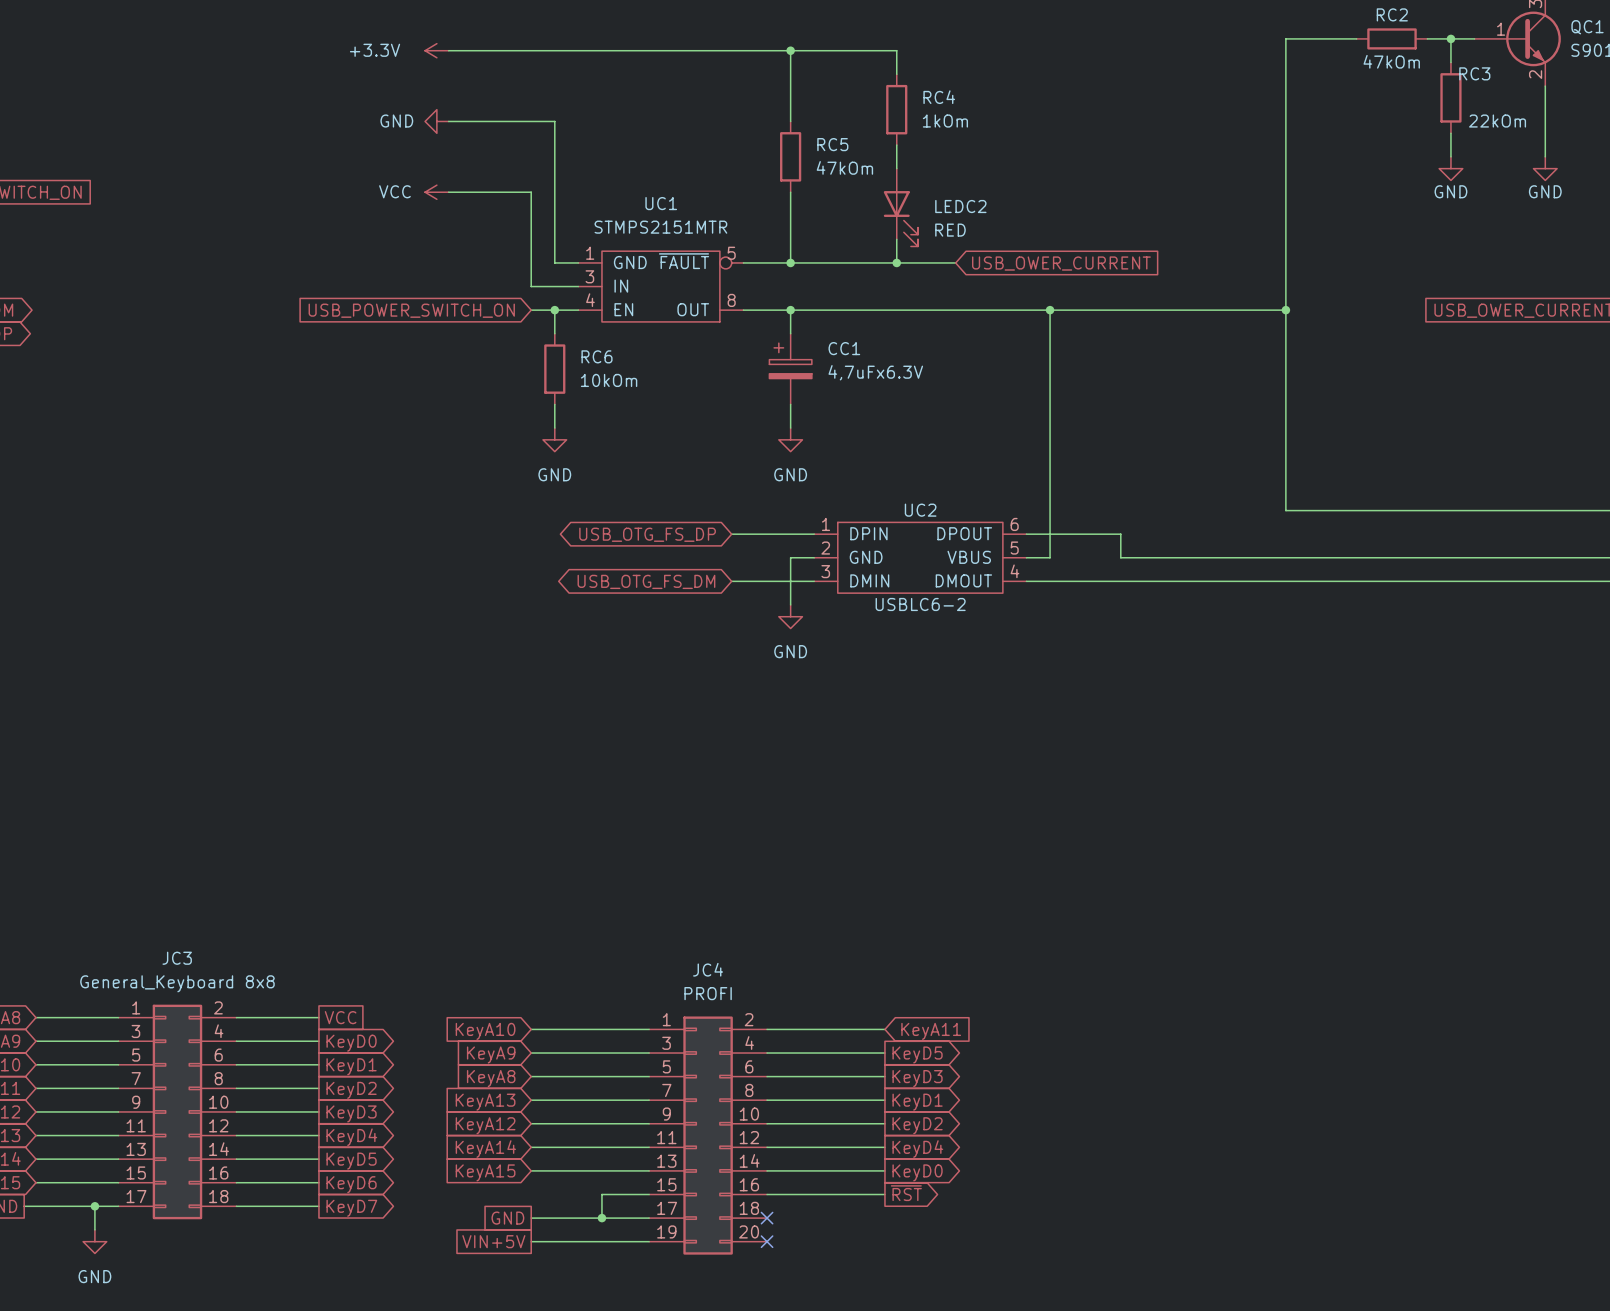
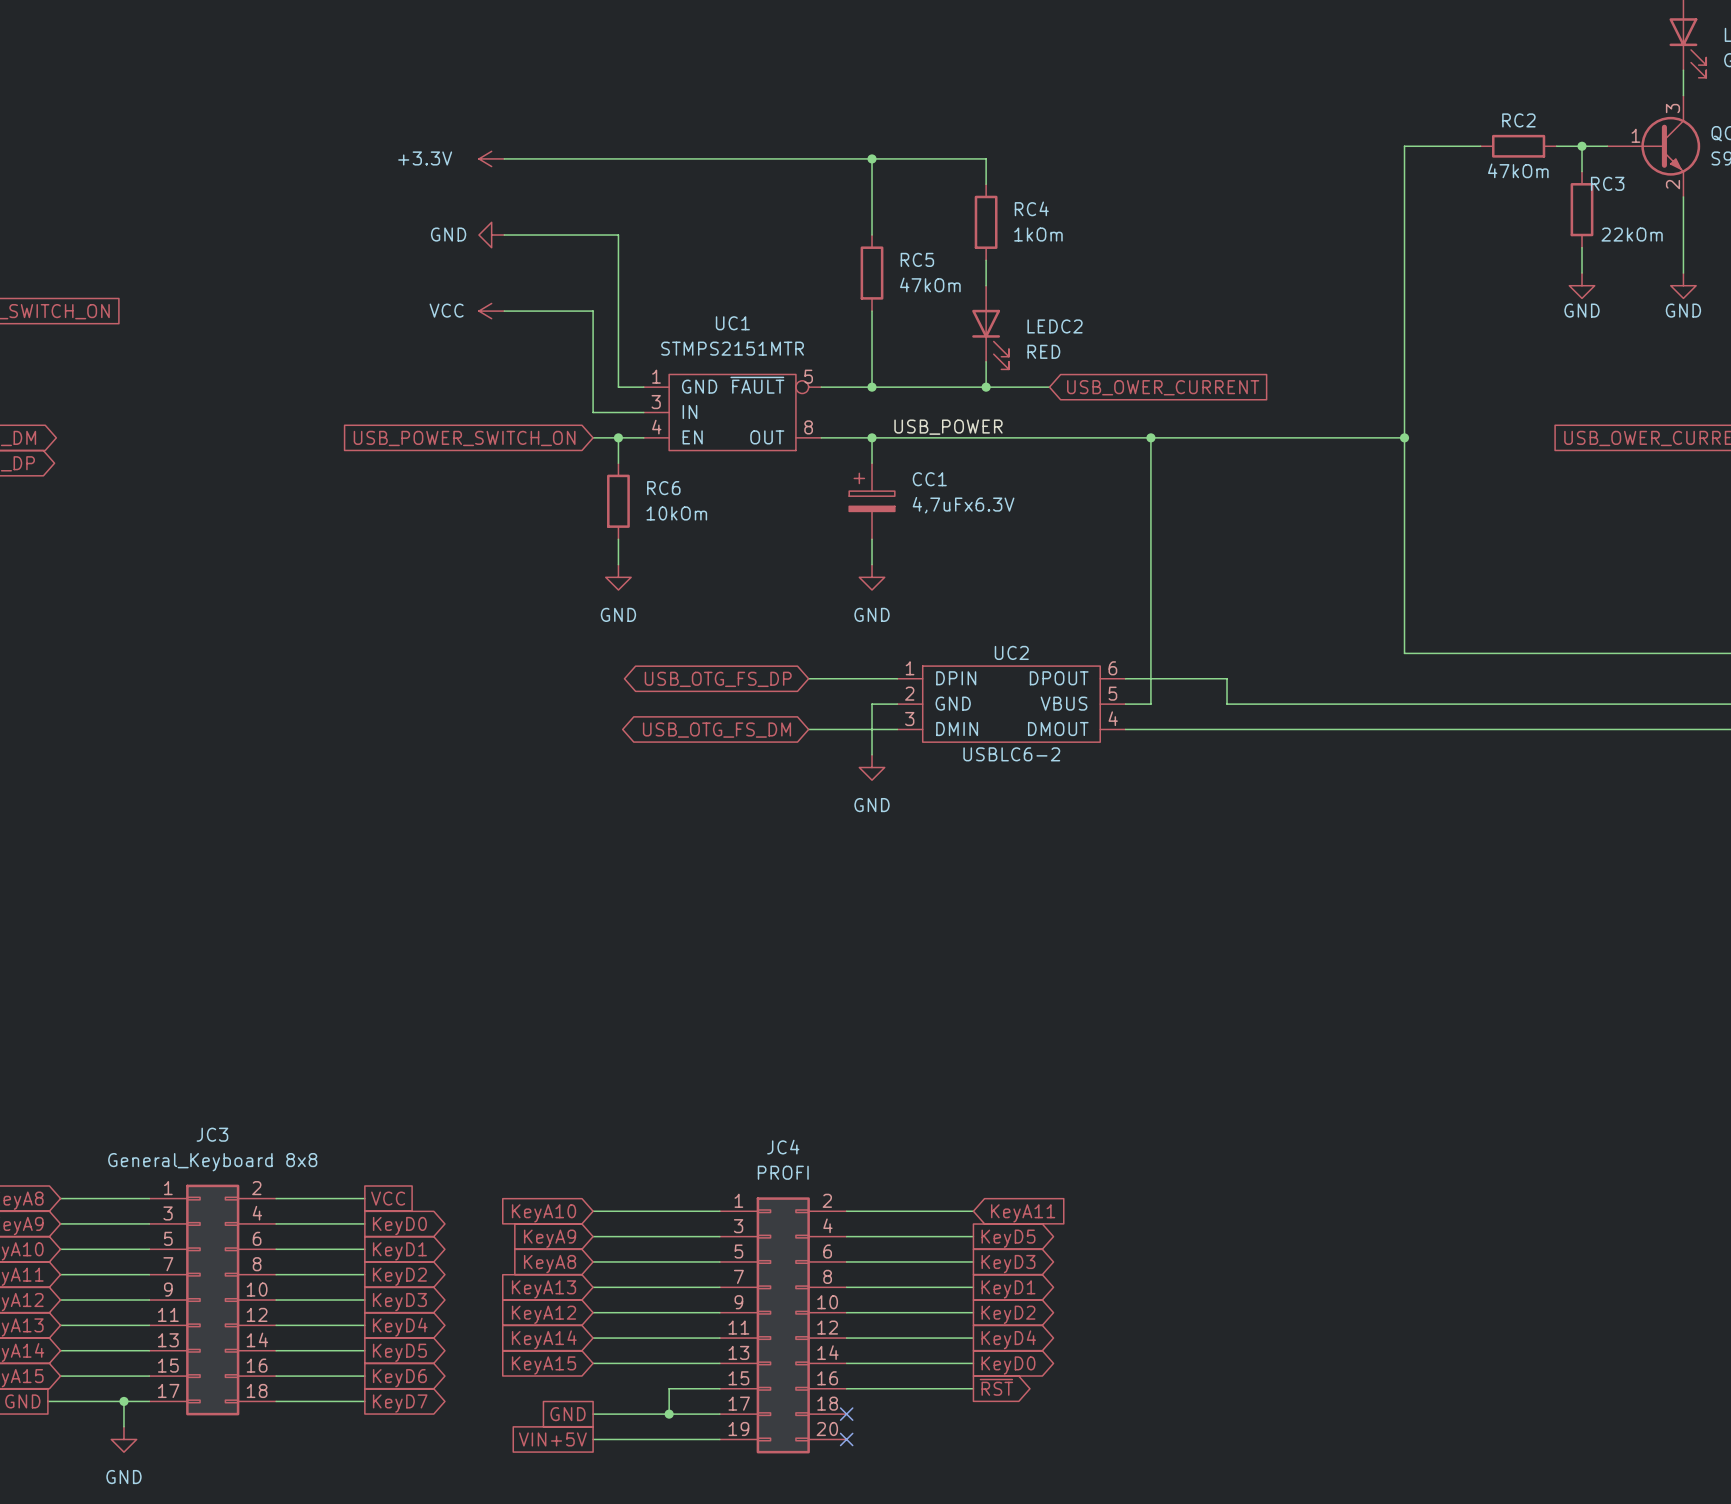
label: none -> USB_POWER (948, 427)

